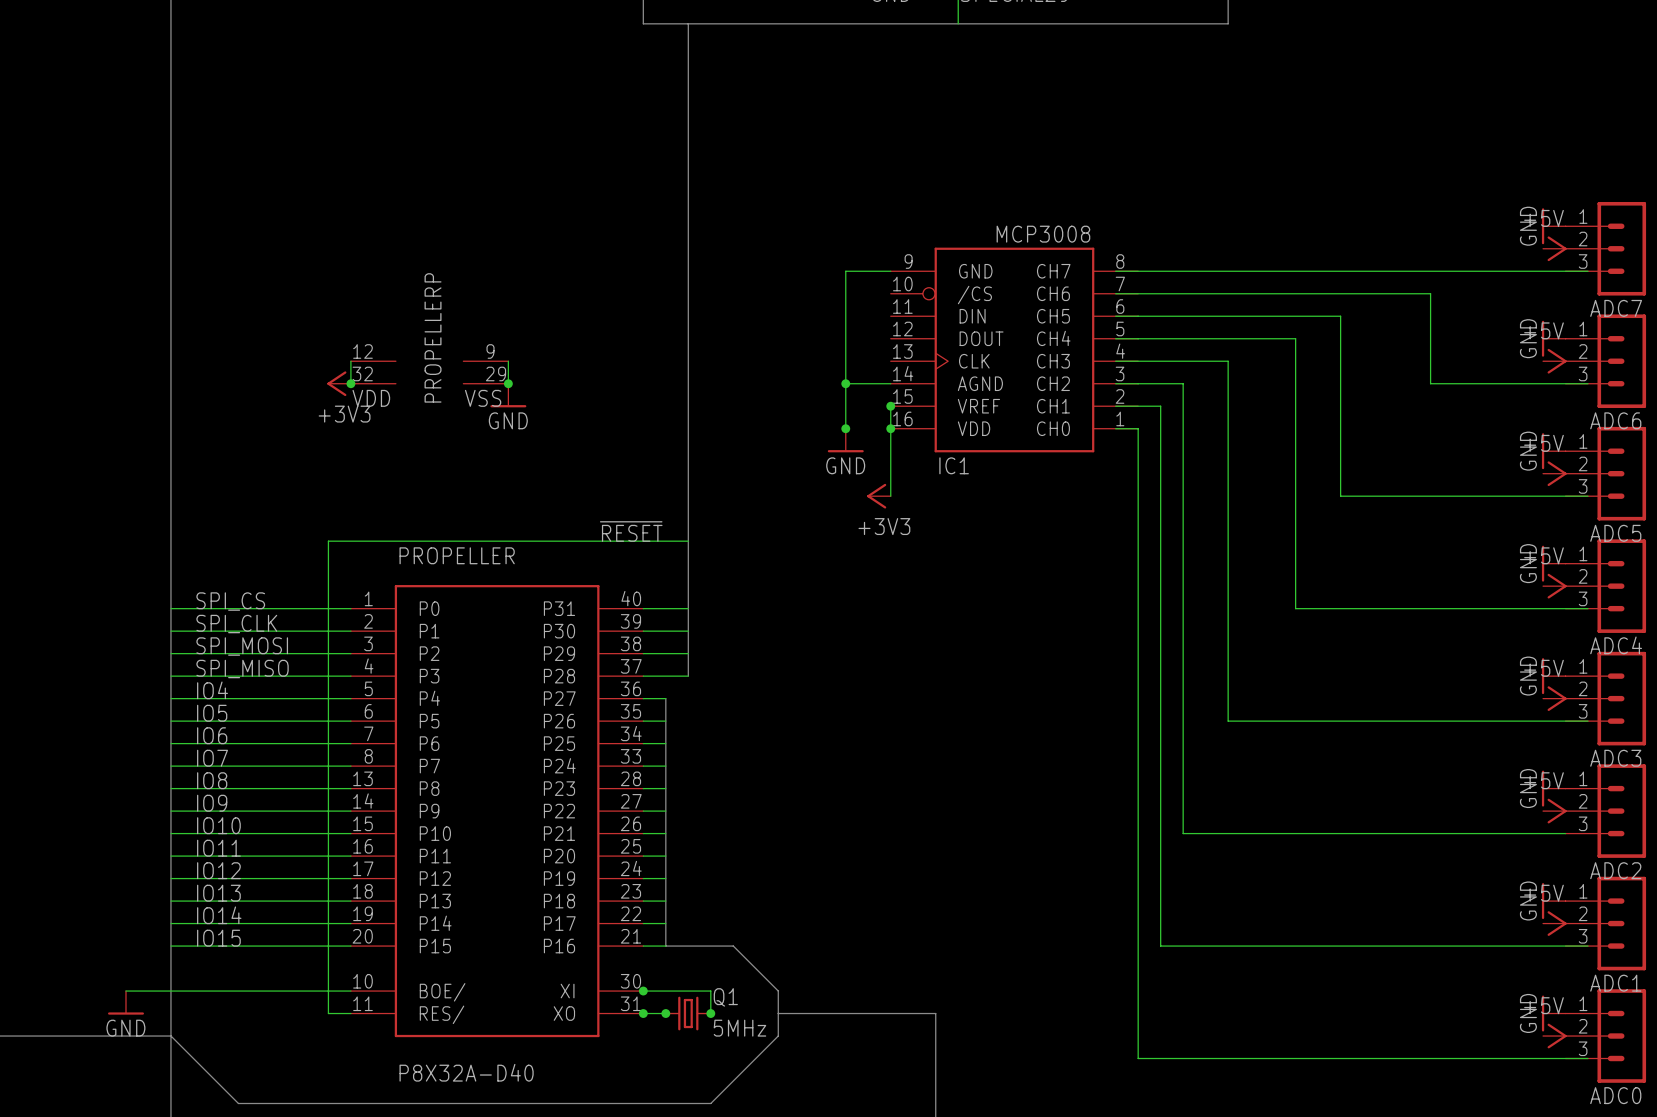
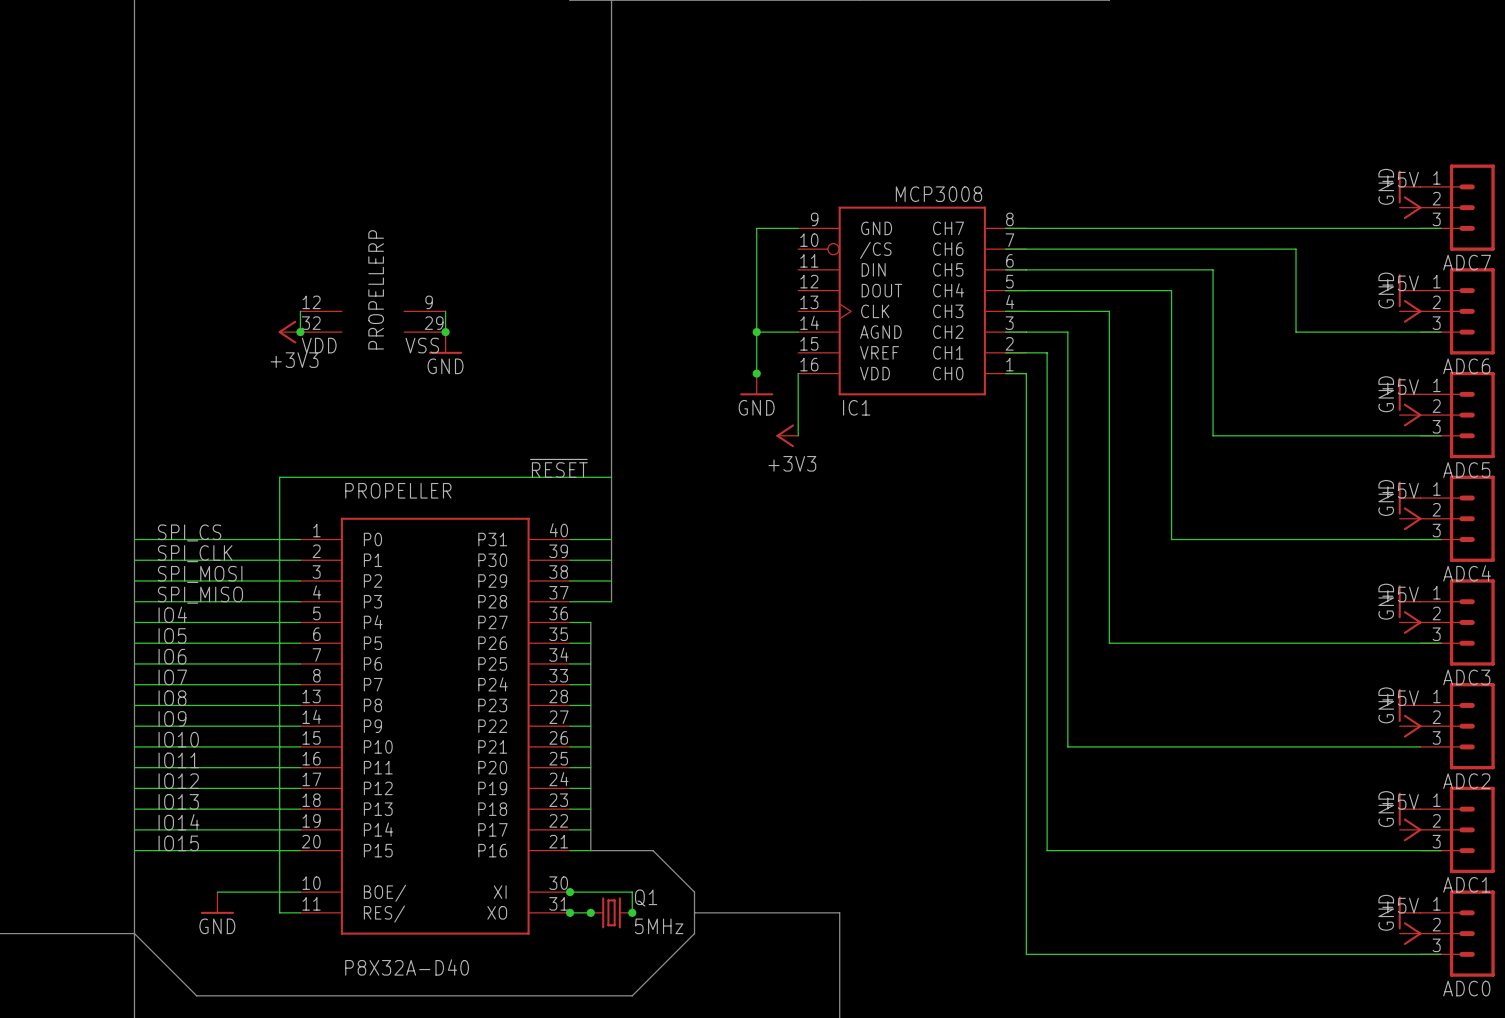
wire: (890, 406) (890, 428) -> none
junction: (890, 406) -> none
junction: (890, 428) -> none
wire: (125, 991) (260, 991) -> none
power symbol position: GND (125, 1002) -> GND (217, 903)

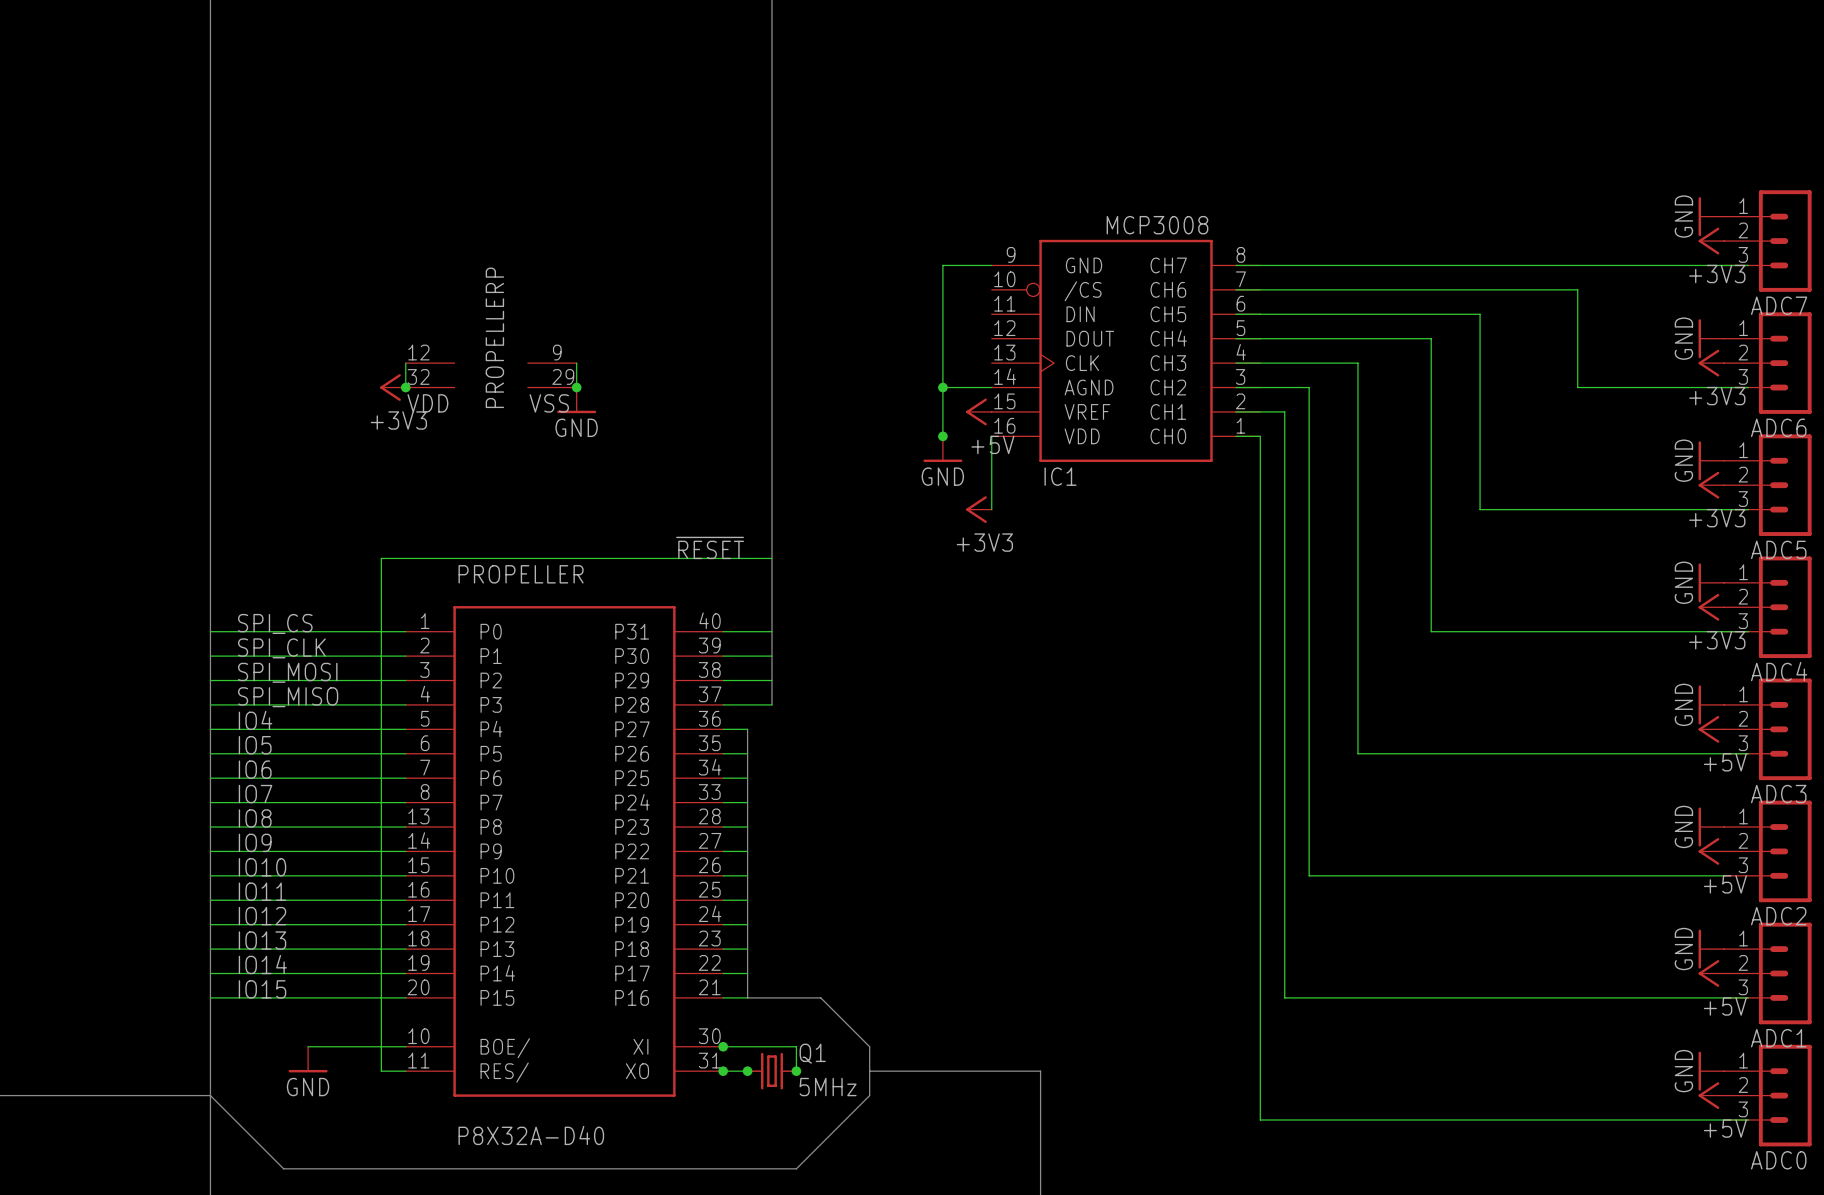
power symbol: +5V (1410, 207) -> +3V3 (1711, 241)
power symbol: +5V (1410, 311) -> +3V3 (1711, 363)
power symbol: none -> +5V (978, 411)
power symbol: +5V (1410, 415) -> +3V3 (1711, 485)
power symbol: +5V (1410, 518) -> +3V3 (1711, 607)
power symbol rotation: 0° (1412, 622) -> 180° (1708, 729)
power symbol rotation: 0° (1412, 726) -> 180° (1708, 851)
power symbol rotation: 0° (1412, 829) -> 180° (1708, 973)
power symbol rotation: 0° (1412, 933) -> 180° (1708, 1095)

